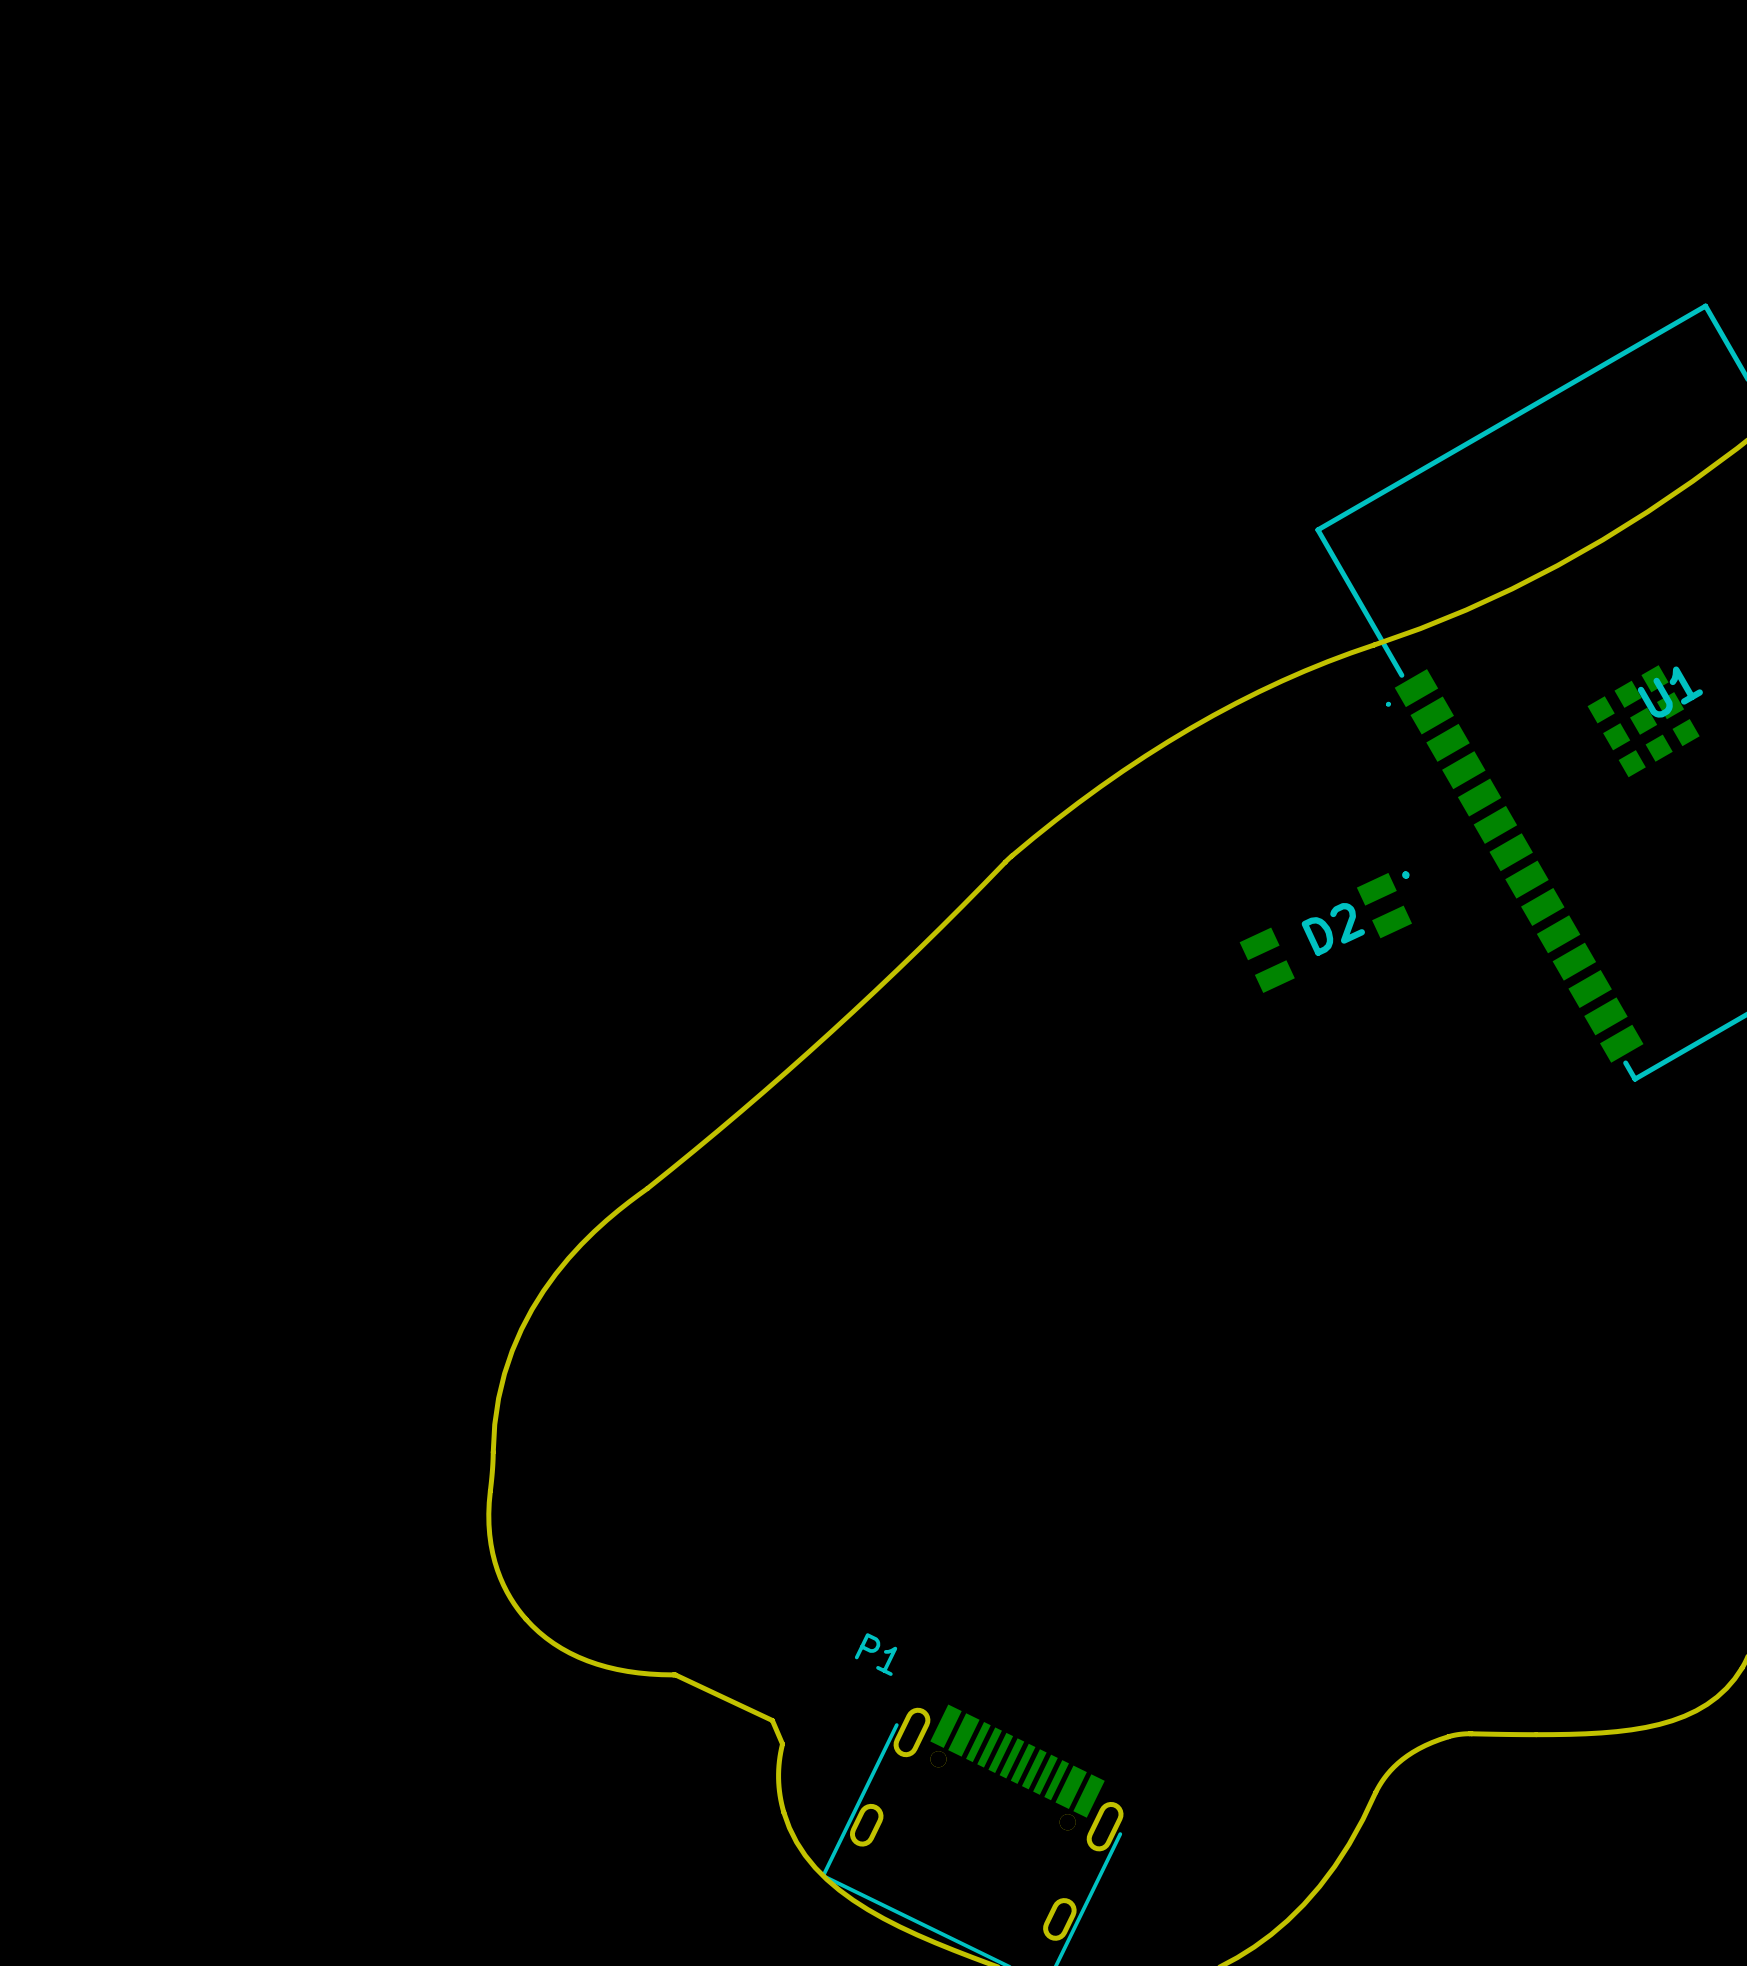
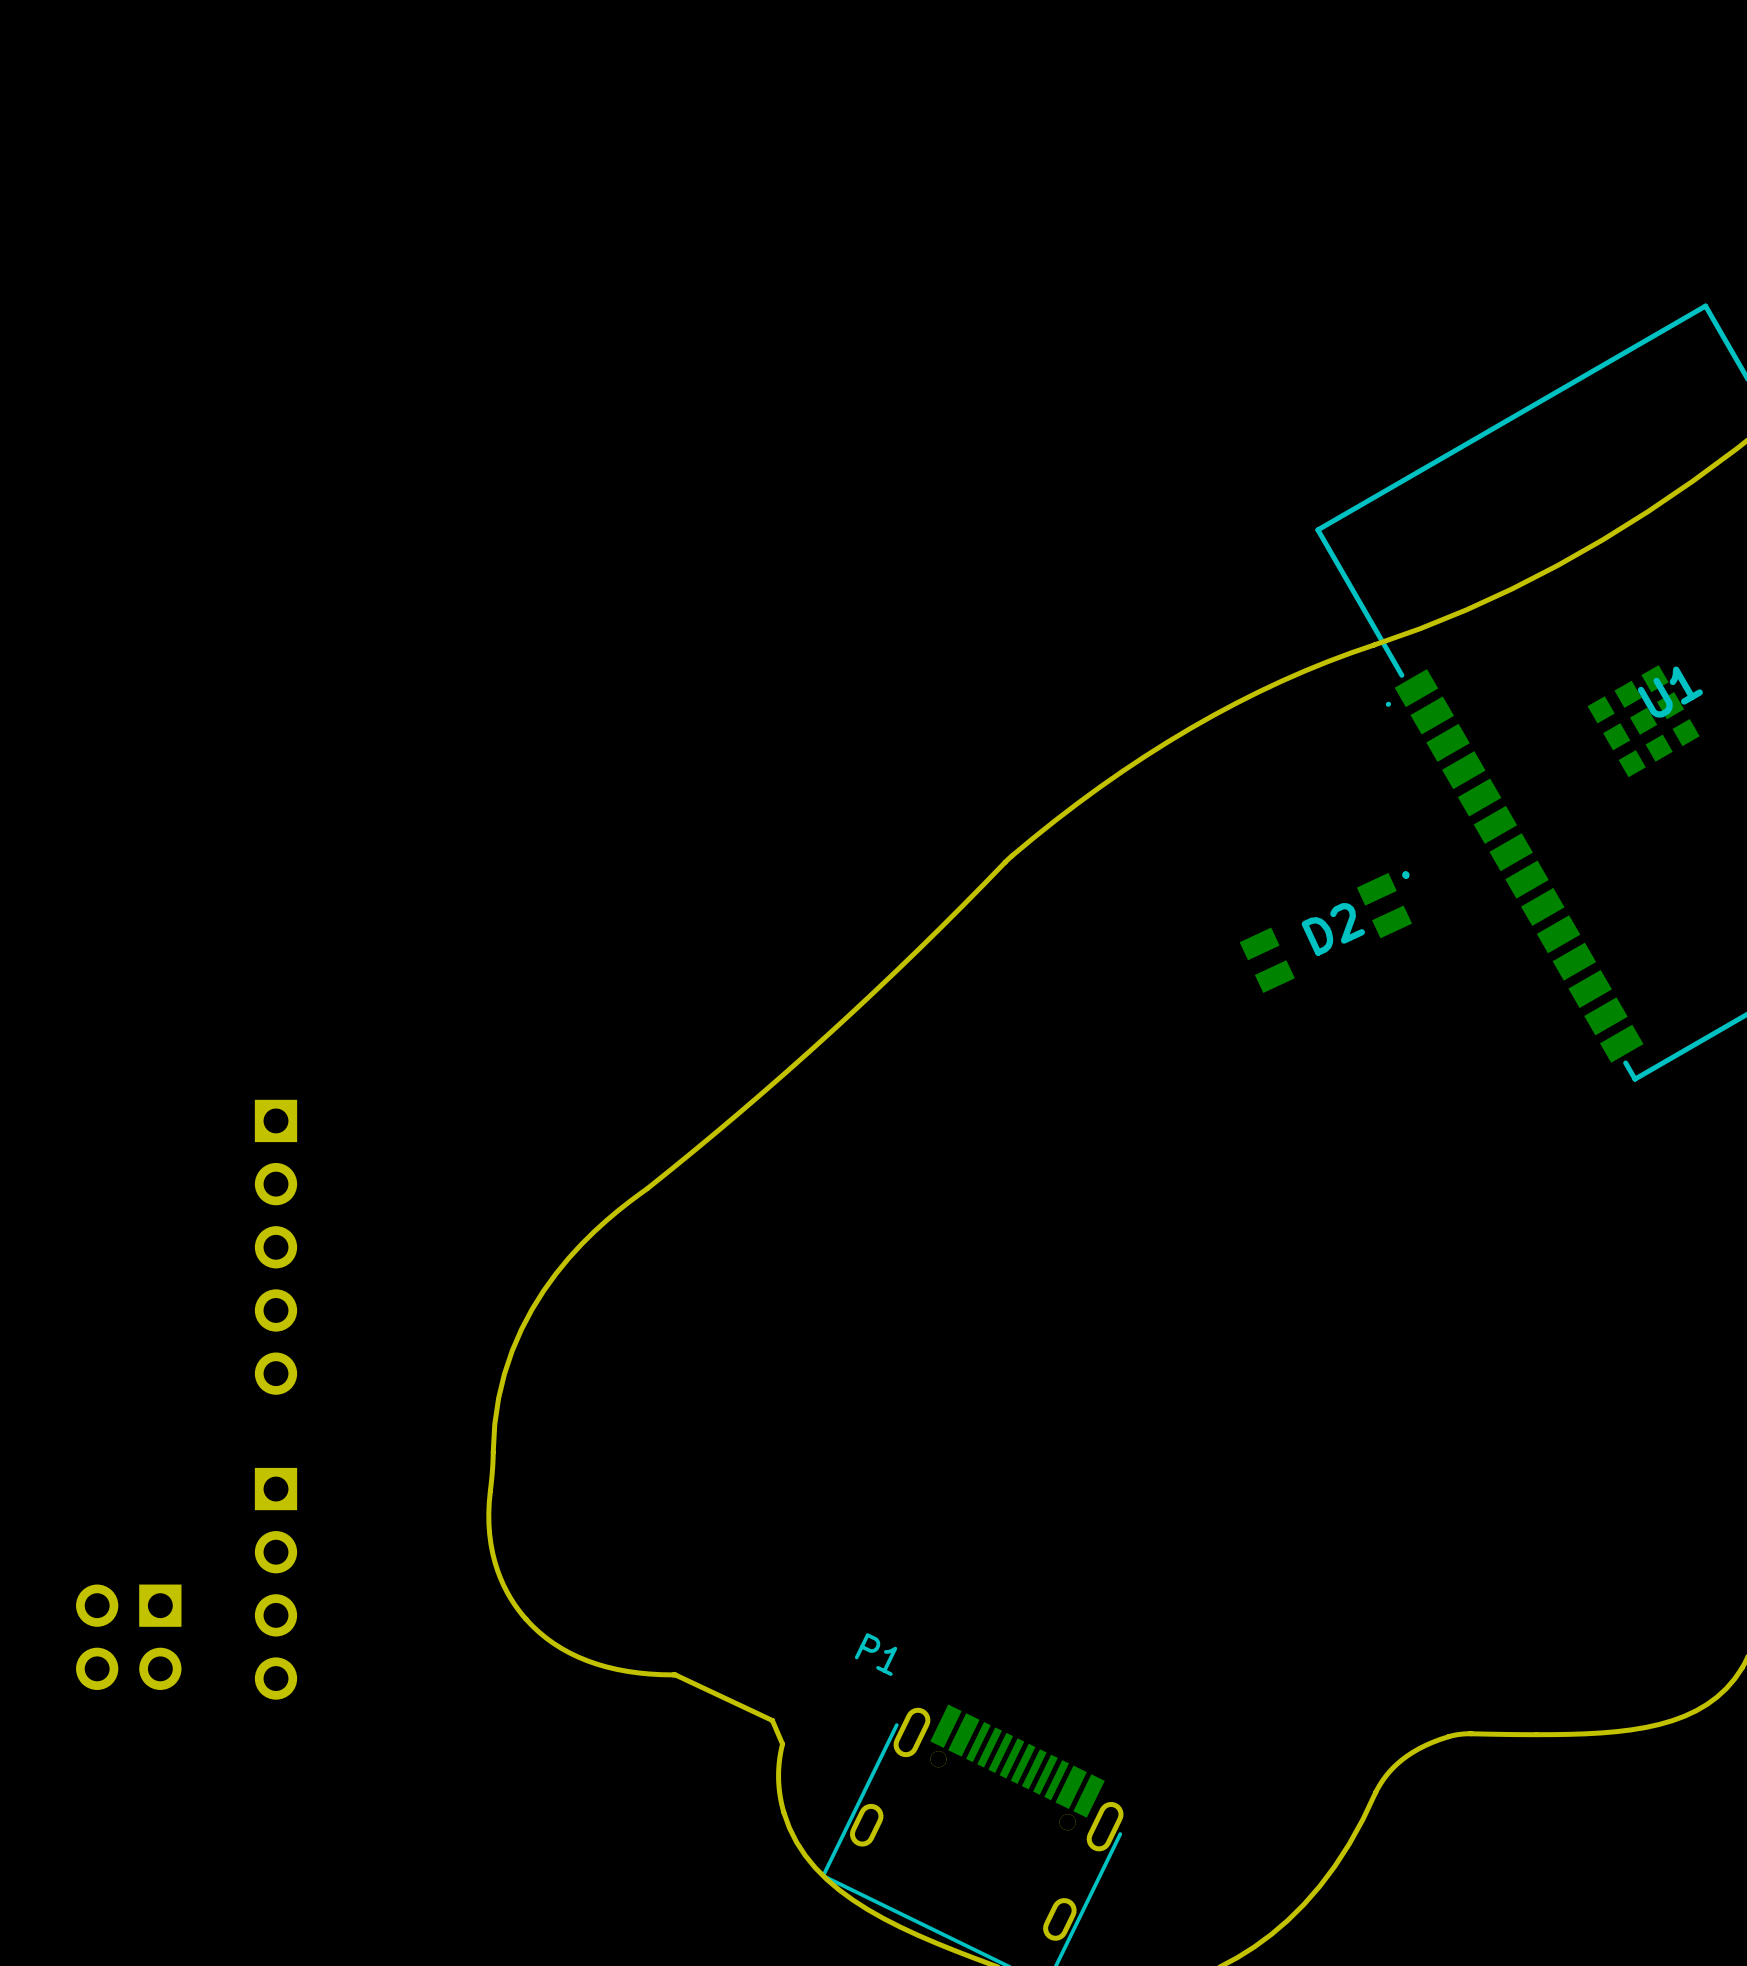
part: none -> (275, 1247)
part: none -> (275, 1583)
part: none -> (128, 1637)

